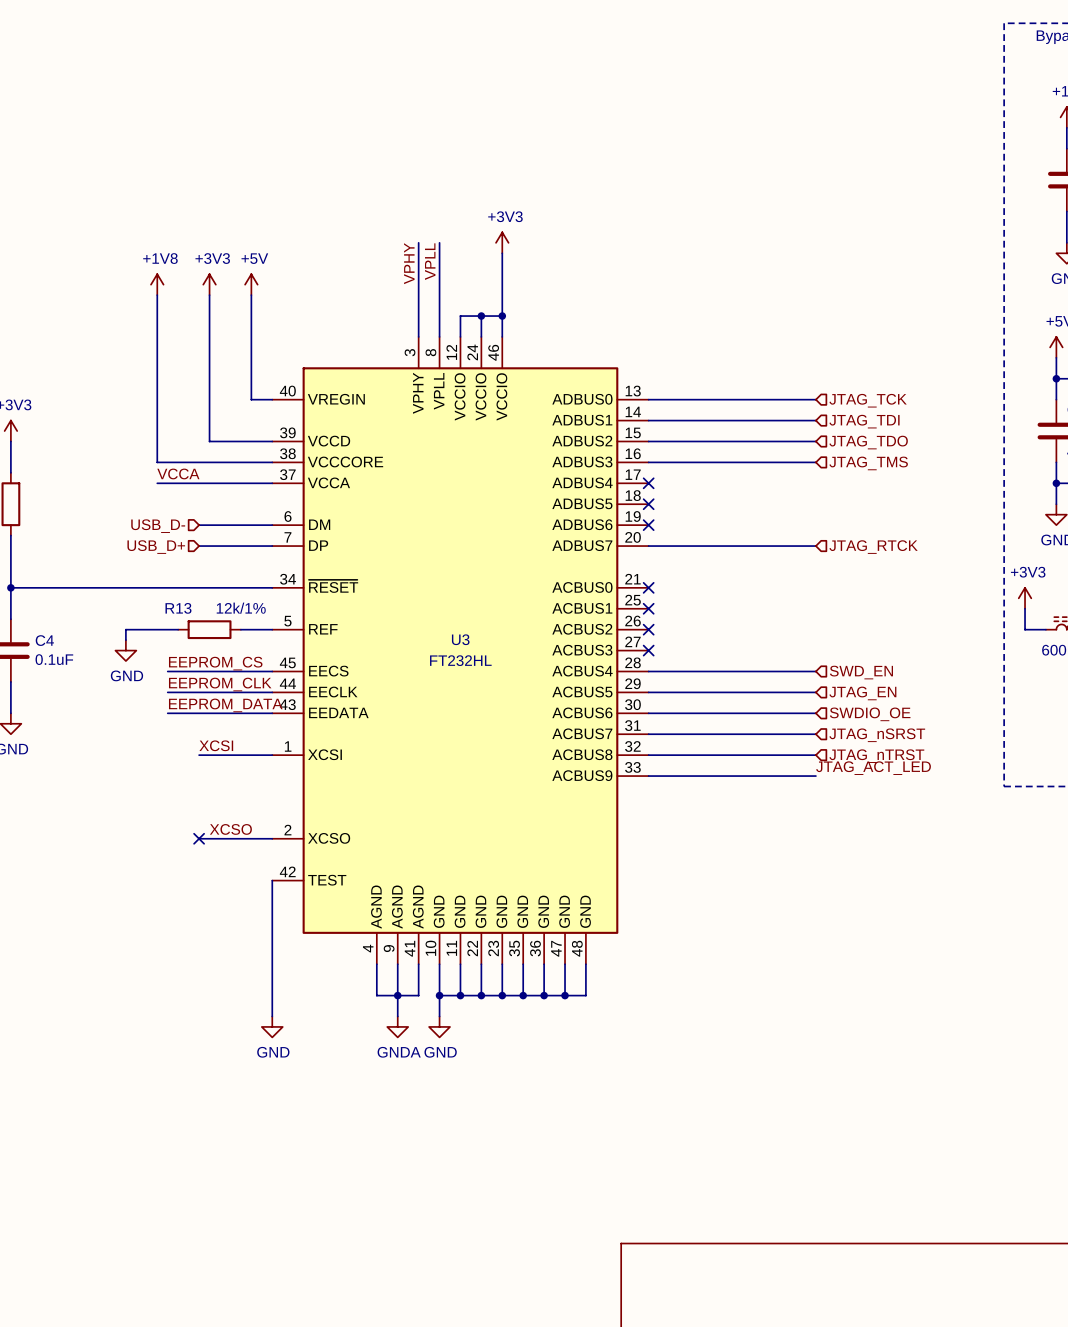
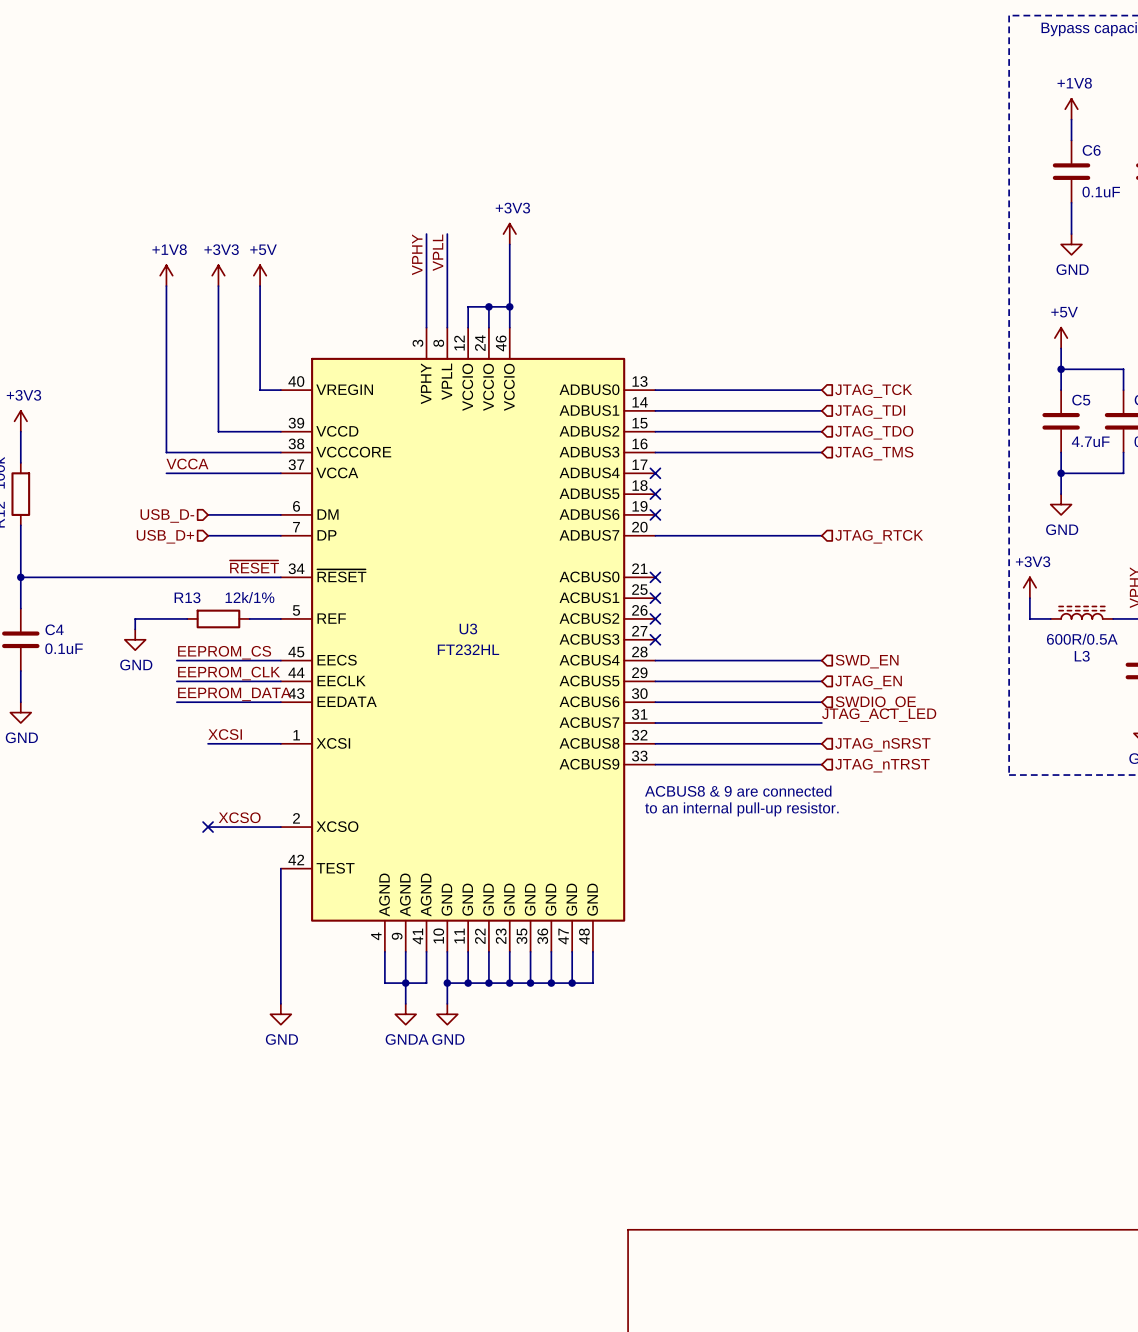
label: none -> ~{RESET} (254, 566)
hierarchical label: JTAG_nSRST (877, 735) -> none
hierarchical label: JTAG_nTRST (876, 756) -> JTAG_nSRST (882, 744)
label position: JTAG_ACT_LED (873, 768) -> JTAG_ACT_LED (879, 715)
hierarchical label: none -> JTAG_nTRST (882, 765)
text: none -> ACBUS8 & 9 are connected (738, 791)
text: none -> to an internal pull-up resistor. (741, 809)

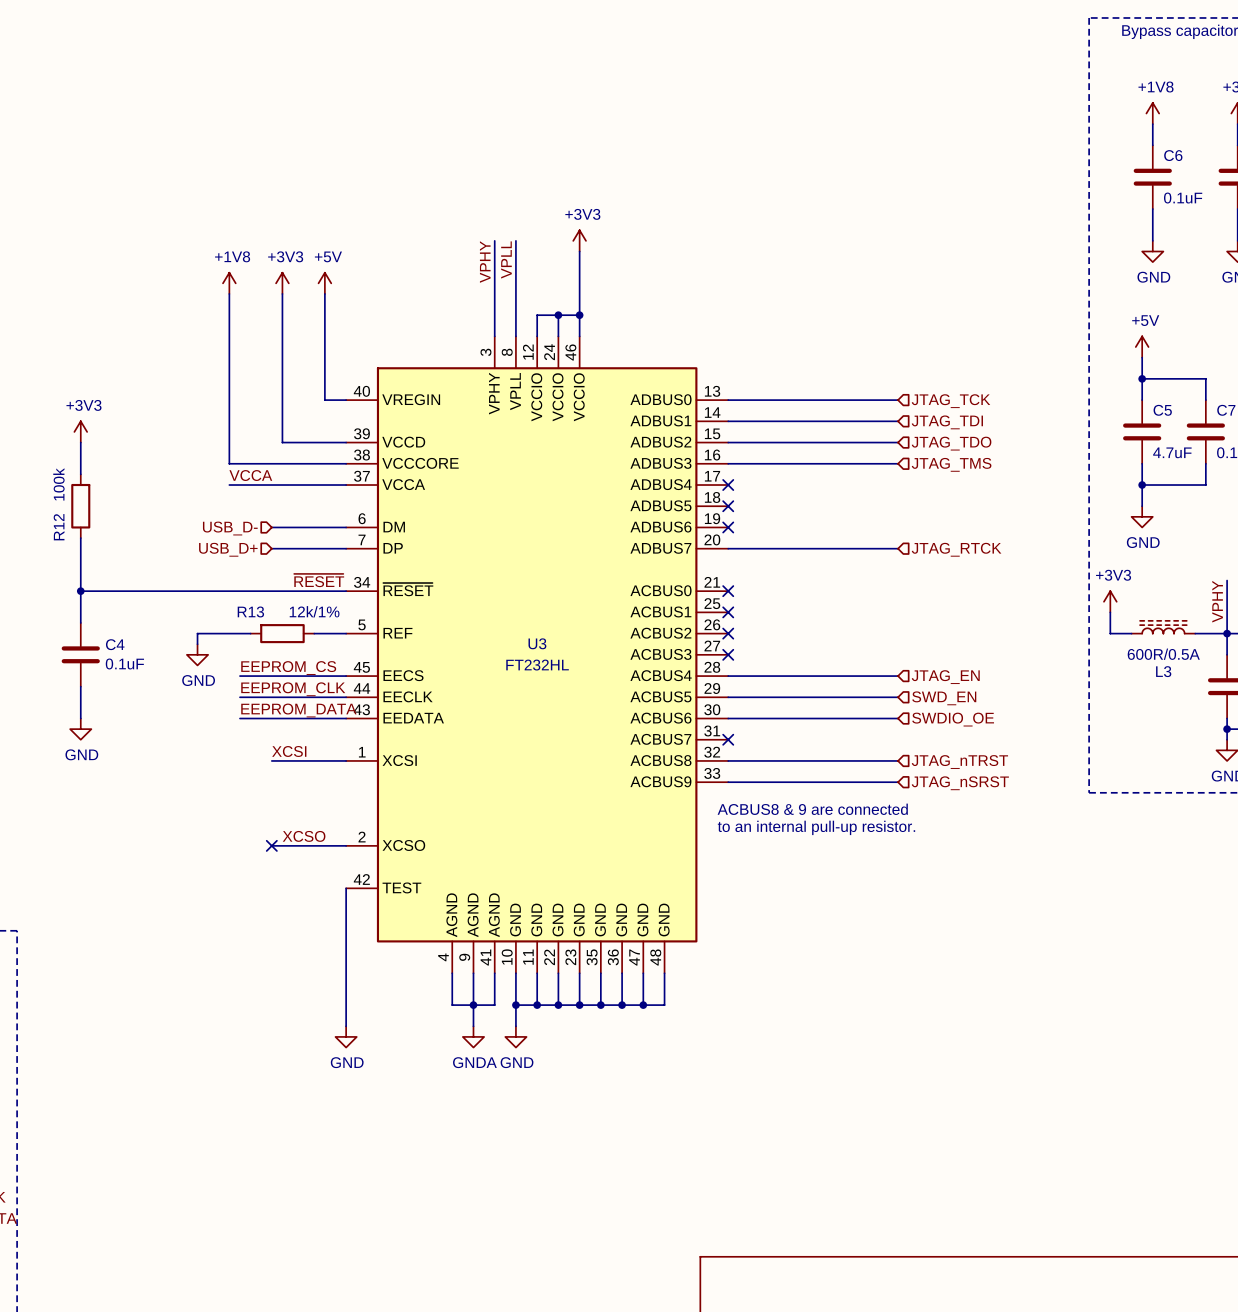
hierarchical label: SWD_EN (867, 661) -> JTAG_EN (945, 677)
hierarchical label: JTAG_EN (868, 682) -> SWD_EN (944, 698)
label: JTAG_ACT_LED (879, 715) -> none
wire: (655, 723) (821, 723) -> none
no-connect mark: none -> (728, 739)
hierarchical label: JTAG_nSRST (882, 744) -> JTAG_nTRST (959, 762)
hierarchical label: JTAG_nTRST (882, 765) -> JTAG_nSRST (960, 783)

